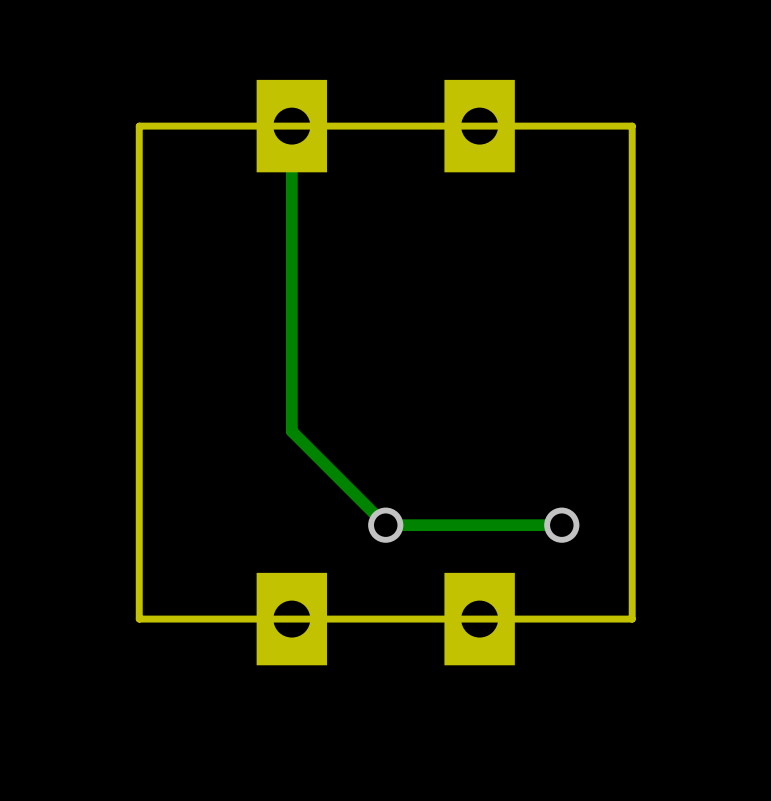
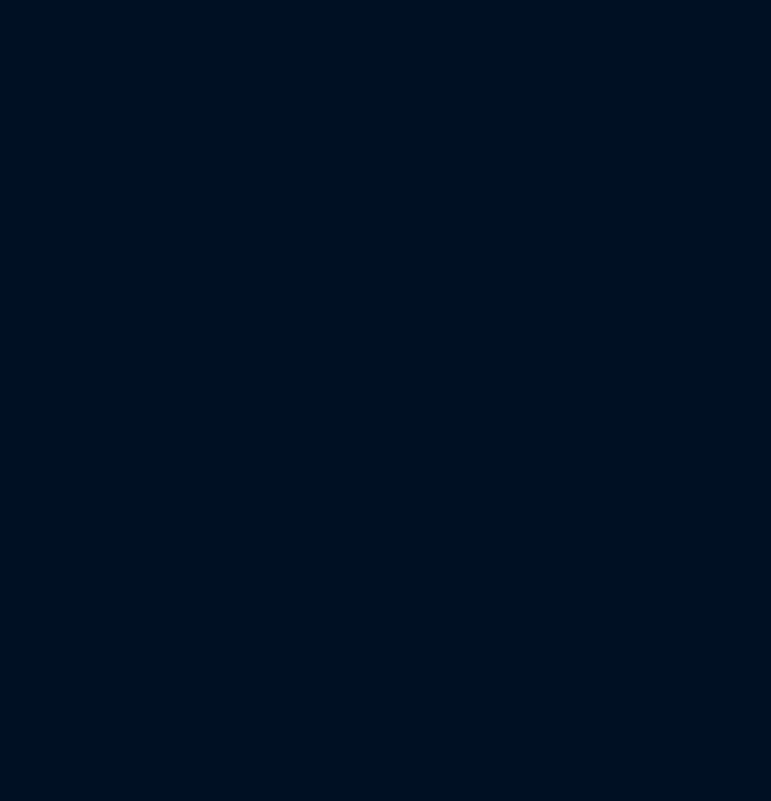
track: (291, 126) (291, 431) (385, 525) (561, 525) -> none
part: (291, 126) -> none
part: (479, 126) -> none
board edge: (632, 126) (139, 126) (139, 619) (632, 619) (632, 126) -> none
via: (385, 525) -> none
via: (561, 525) -> none
part: (291, 619) -> none
part: (479, 619) -> none

